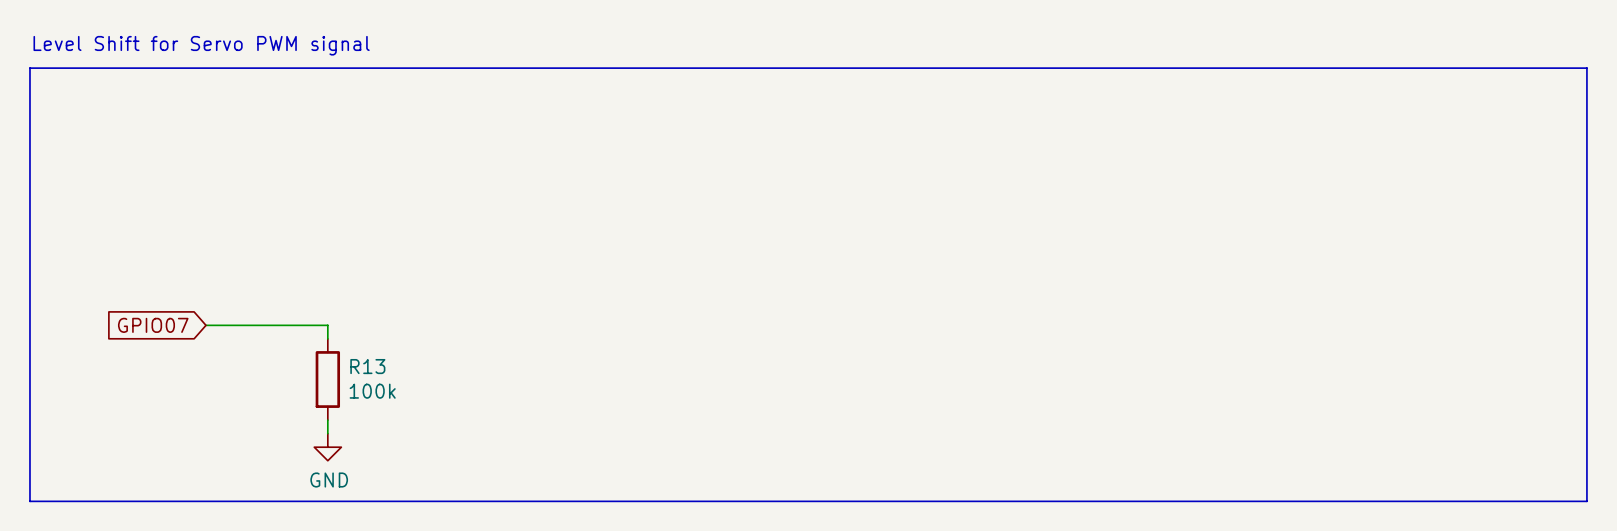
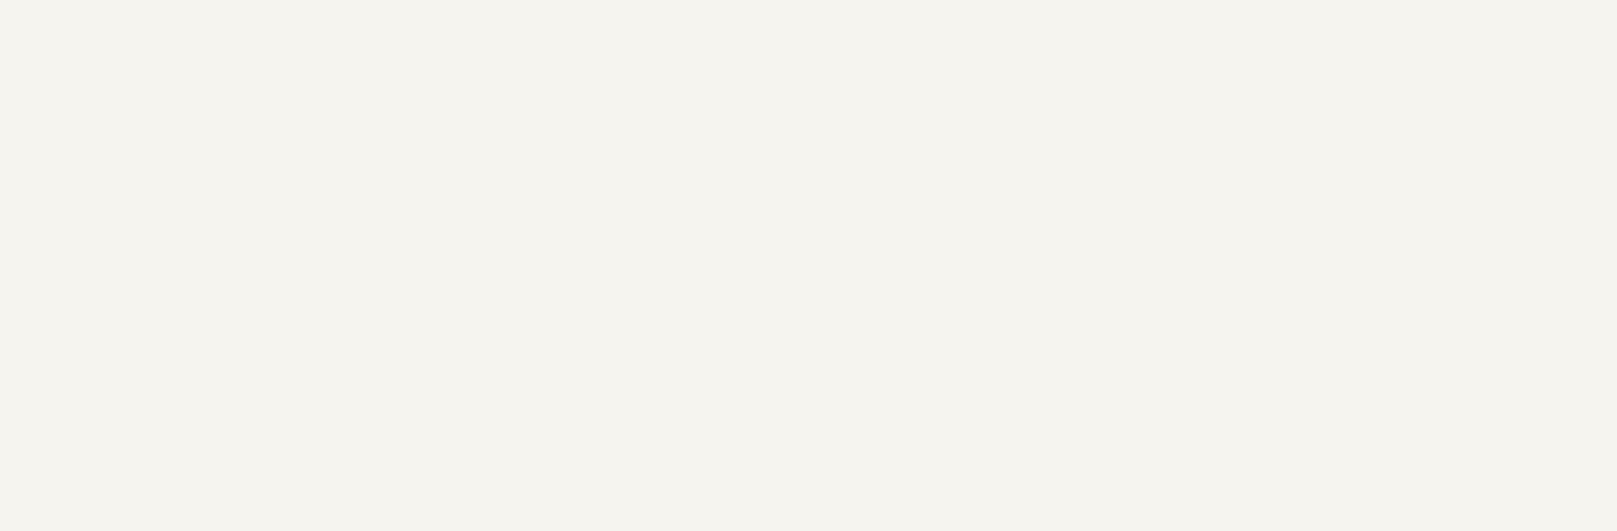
text: Level Shift for Servo PWM signal (201, 45) -> none
line: (29, 68) (29, 501) (1586, 501) (1586, 68) (29, 68) -> none
global label: GPIO07 (153, 325) -> none
wire: (205, 325) (327, 325) (327, 338) -> none
R13: 100k (327, 379) -> none
wire: (327, 420) (327, 433) -> none
power symbol: GND (327, 447) -> none

